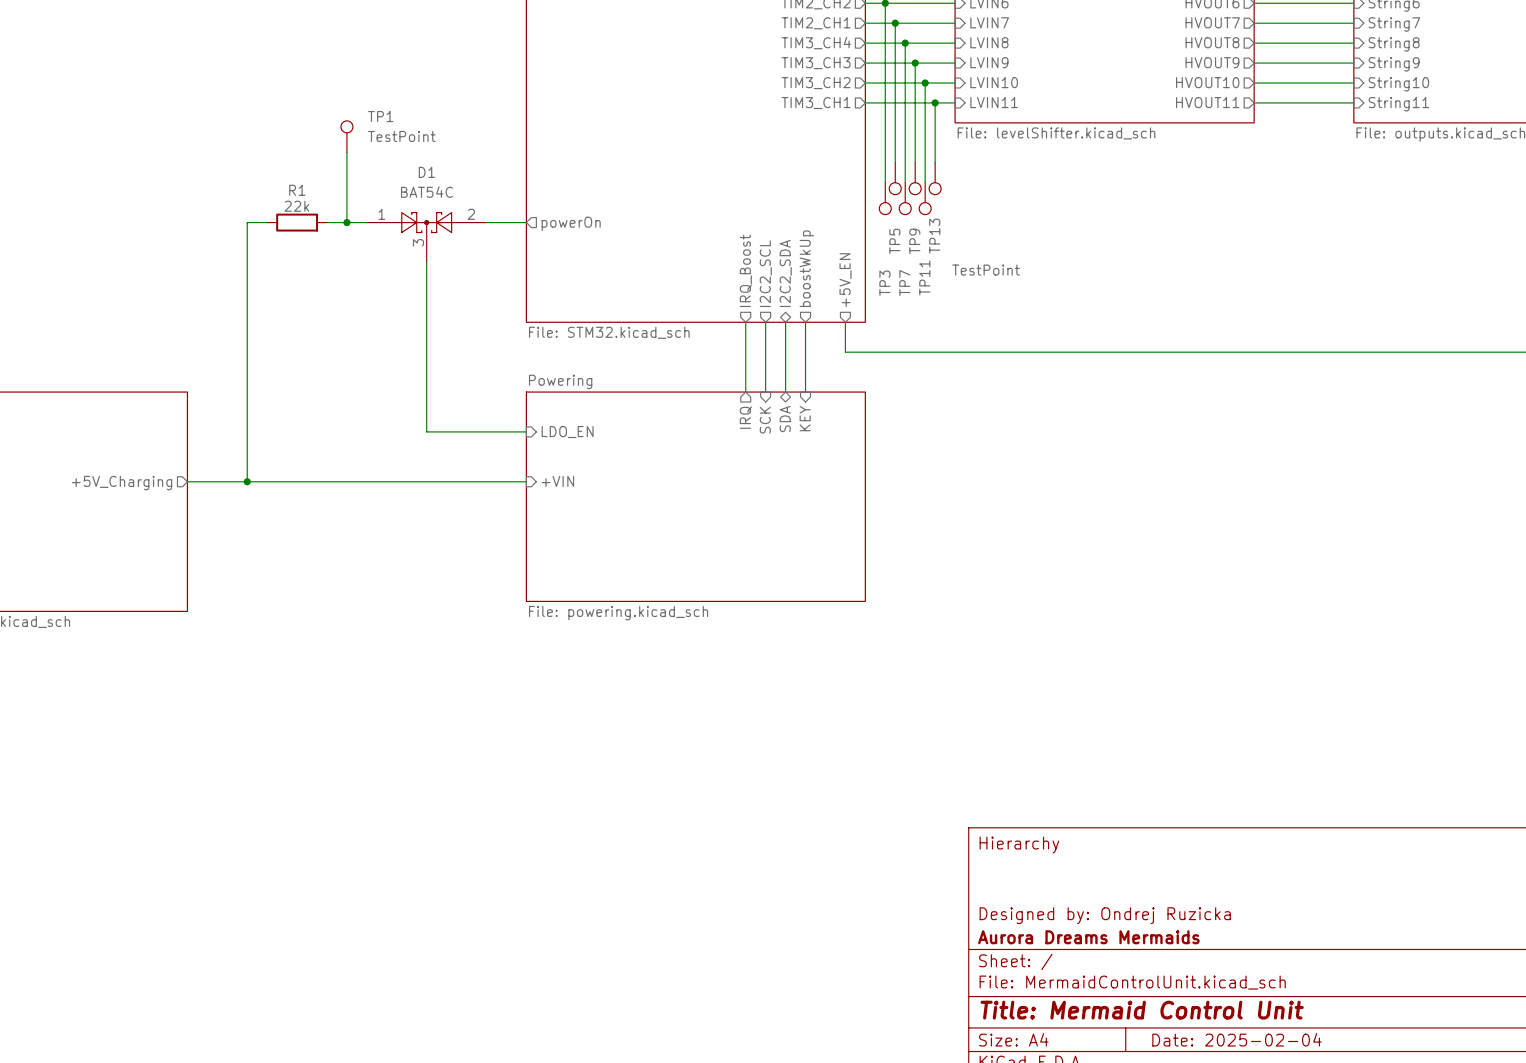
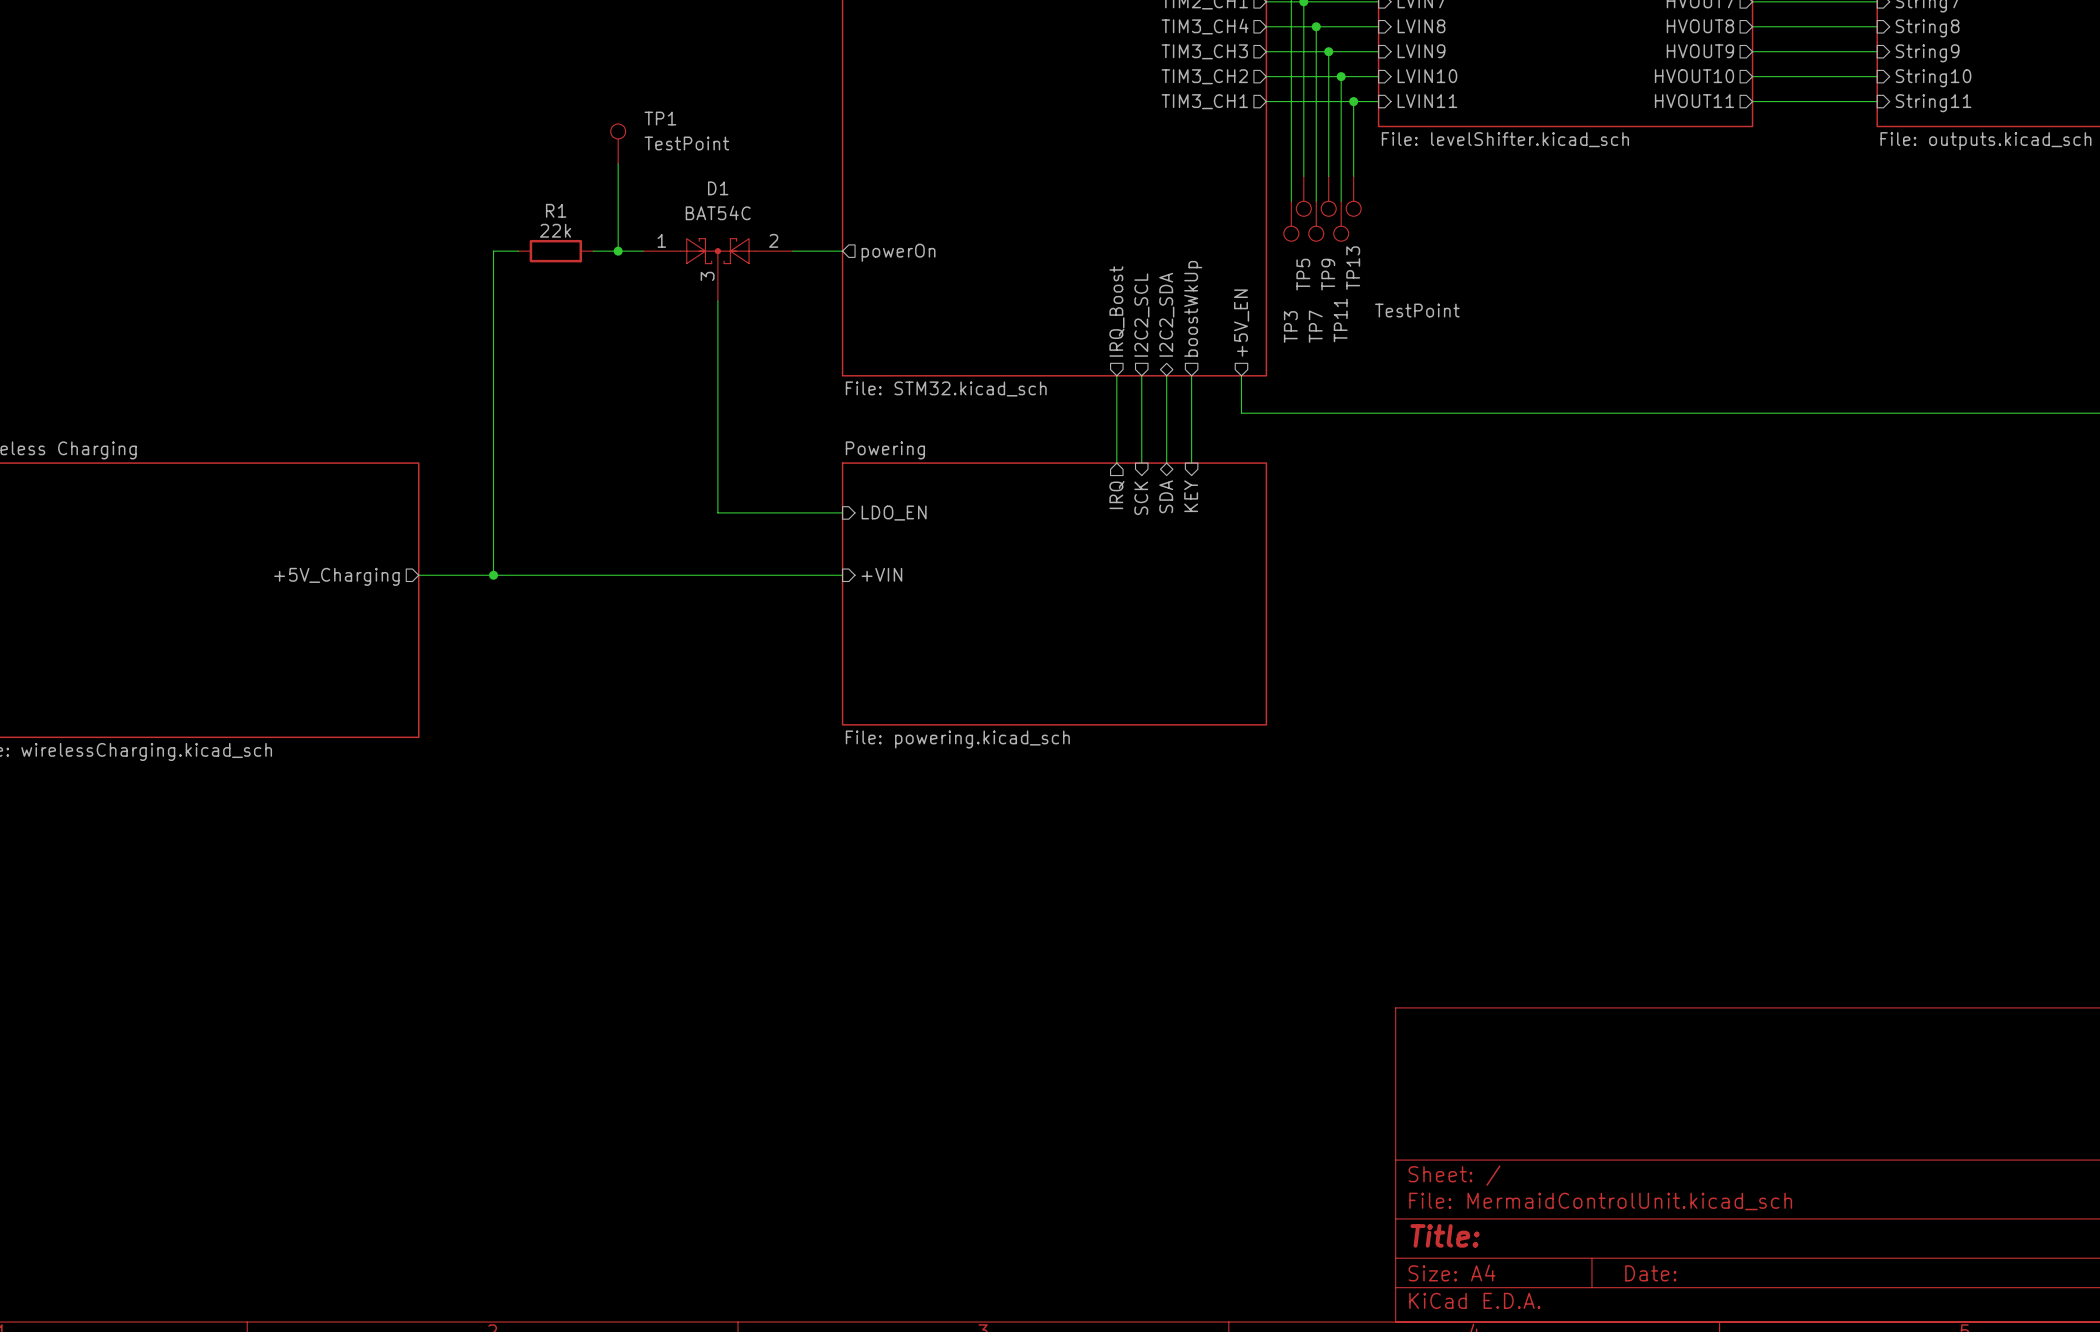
title block: Hierarchy (1019, 845) -> none
title block: Designed by: Ondrej Ruzicka (1105, 915) -> none
title block: Aurora Dreams Mermaids (1088, 937) -> none
title block: Title: Mermaid Control Unit (1142, 1010) -> Title: (1445, 1235)
title block: Date: 2025-02-04 (1236, 1039) -> Date: (1650, 1273)

